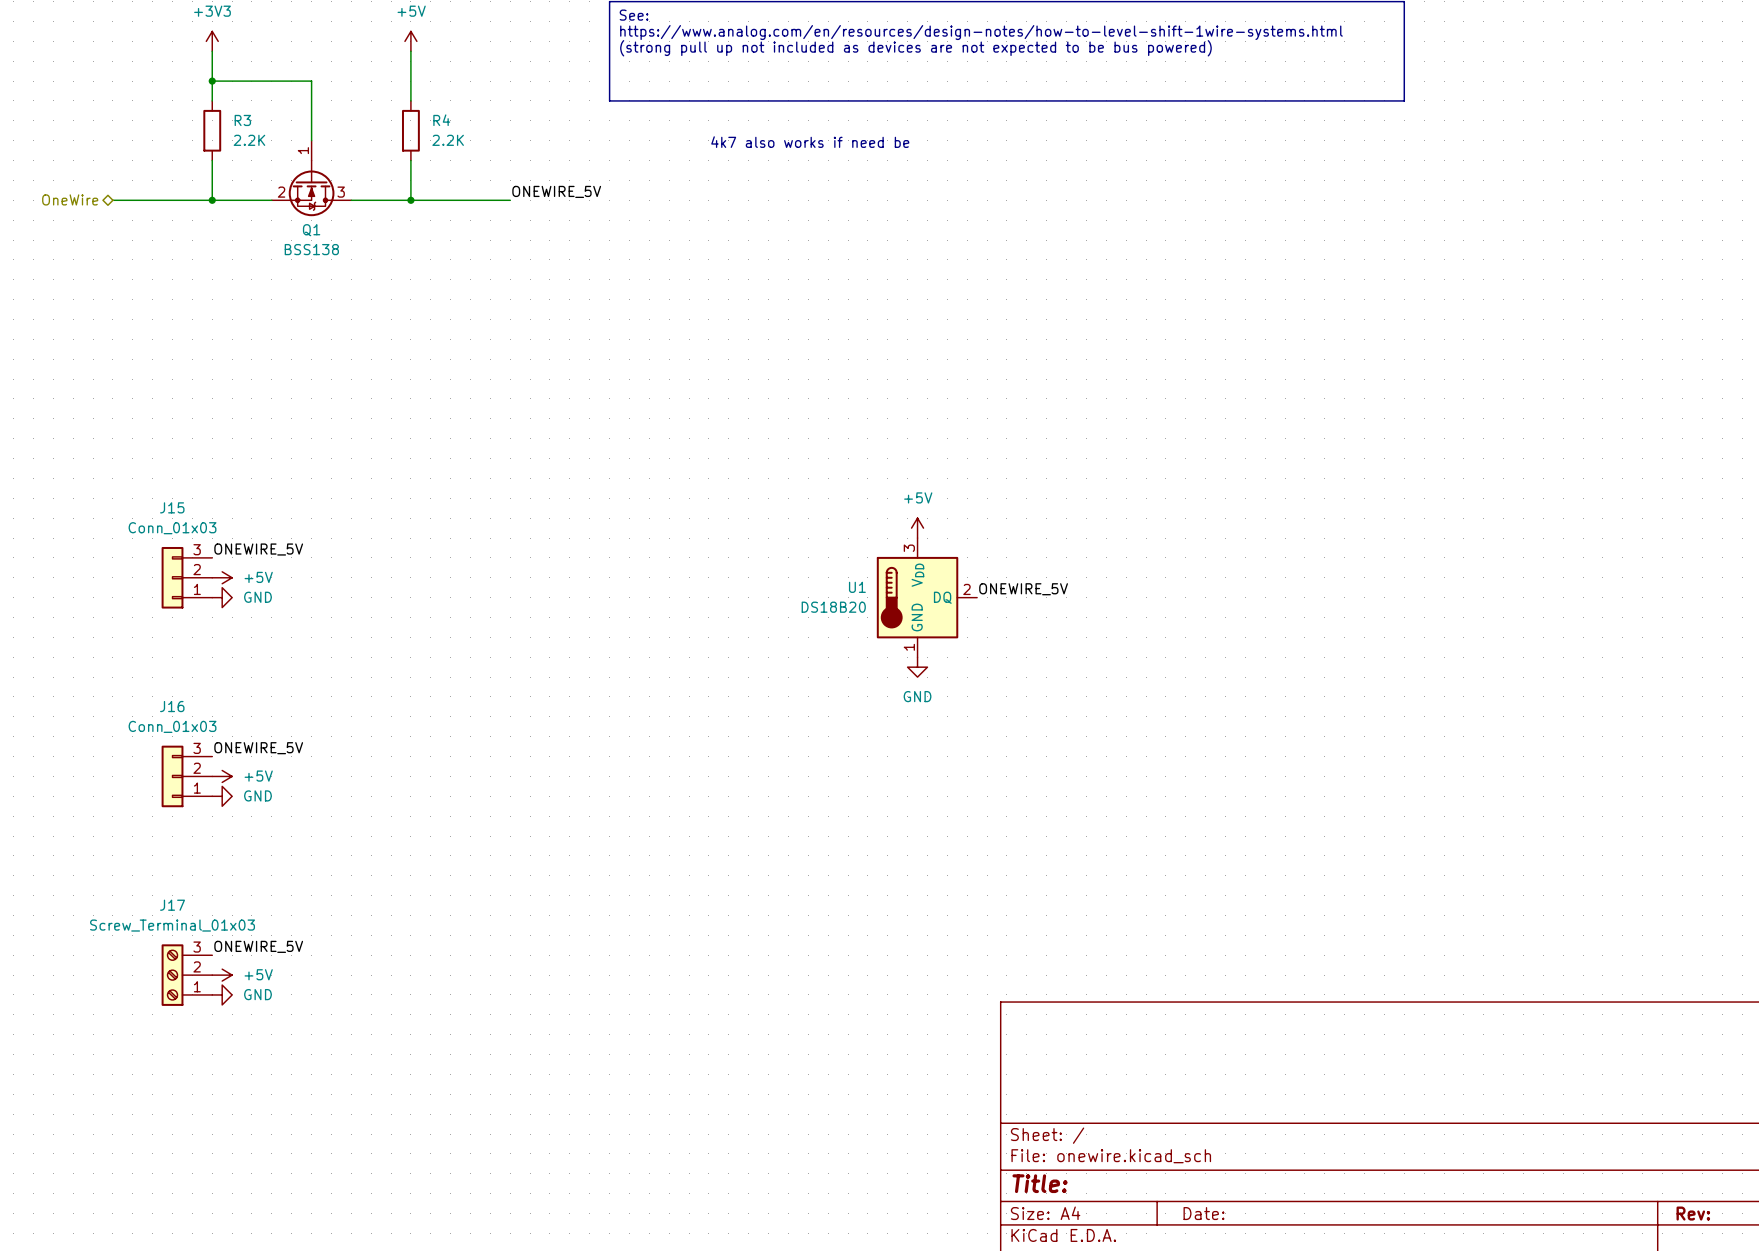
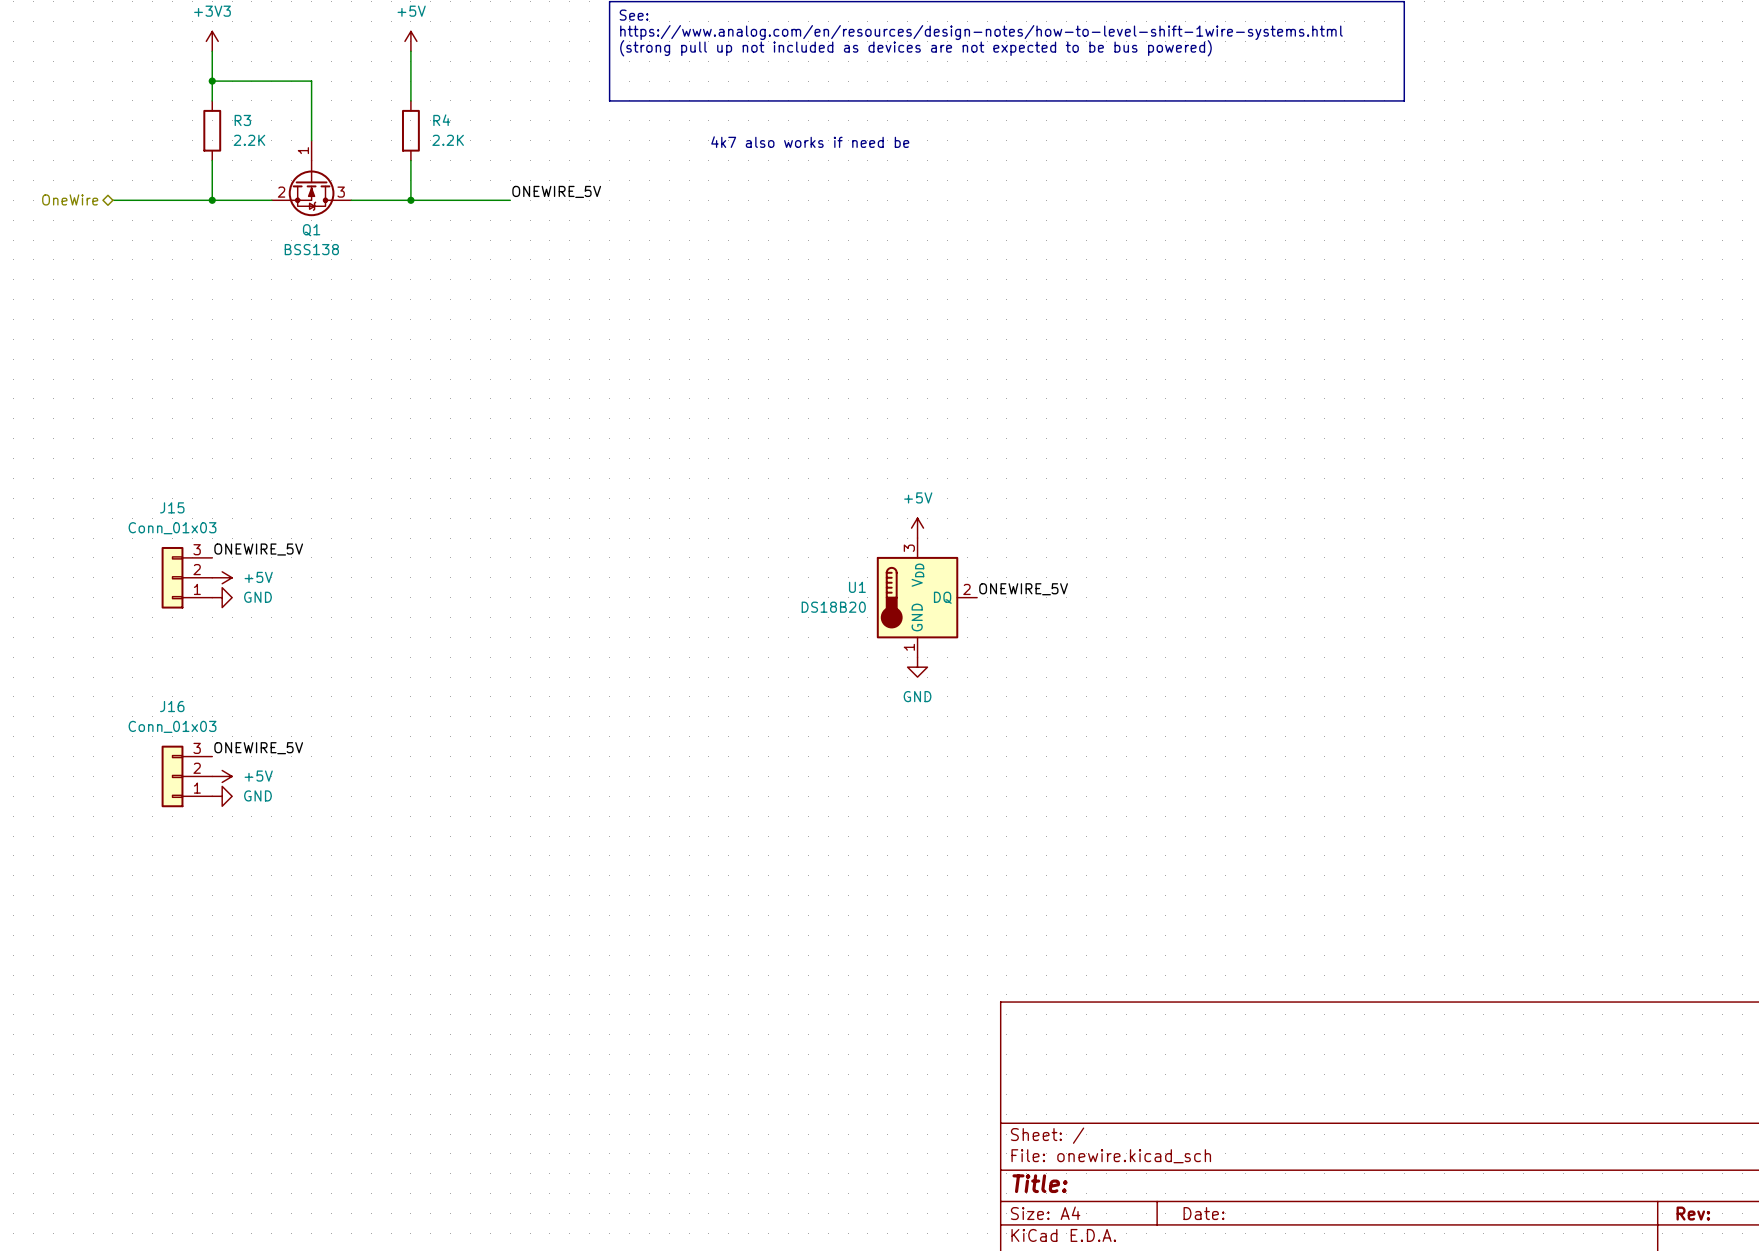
label: ONEWIRE_5V (258, 946) -> none
J17: Screw_Terminal_01x03 (186, 975) -> none
power symbol: +5V (222, 975) -> none
power symbol: GND (222, 994) -> none

